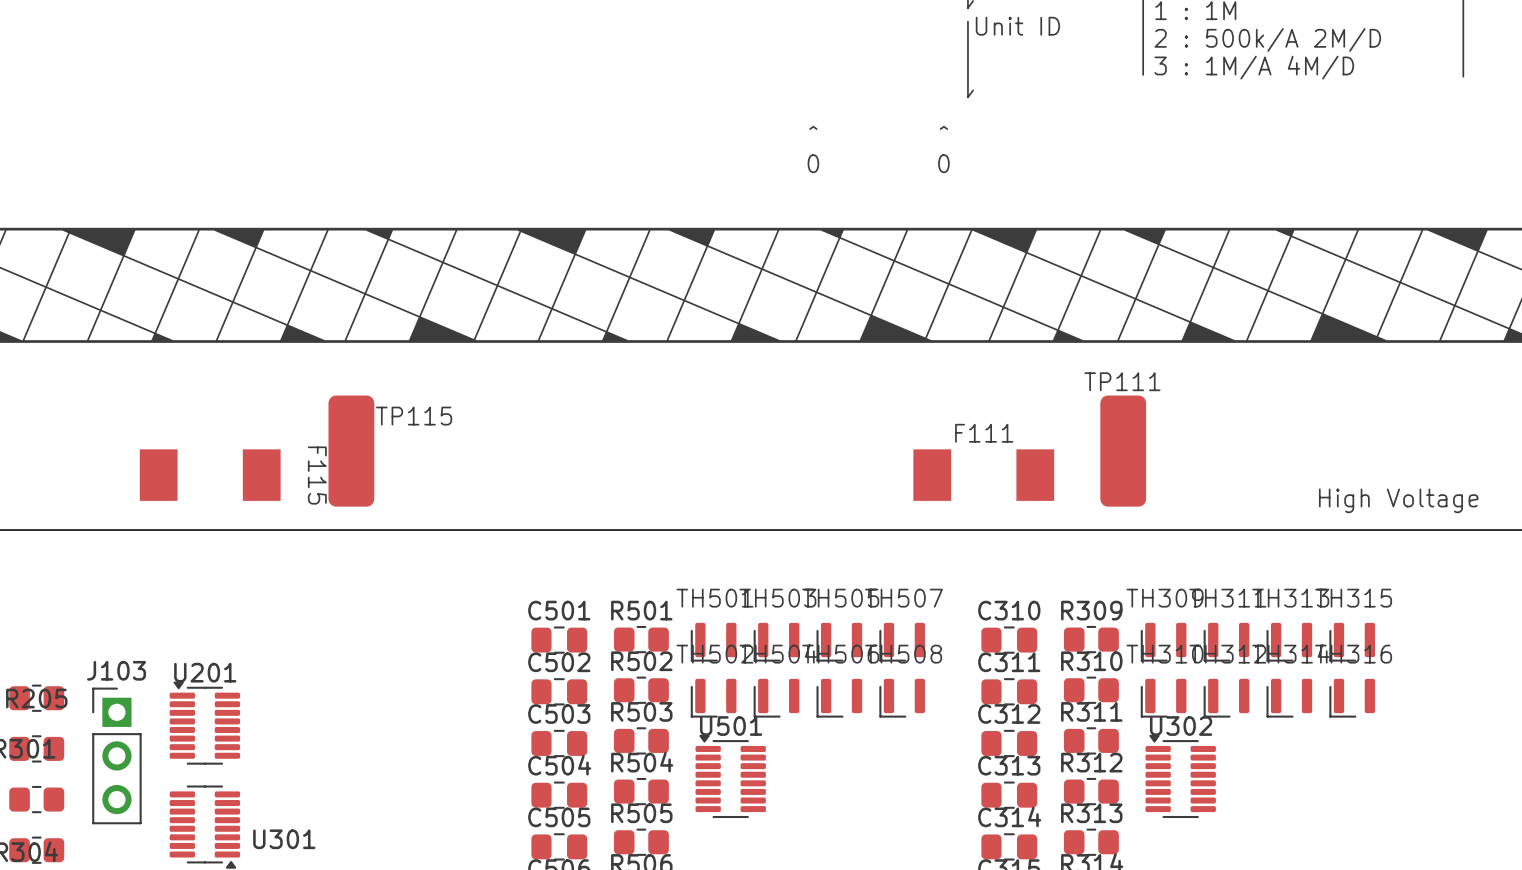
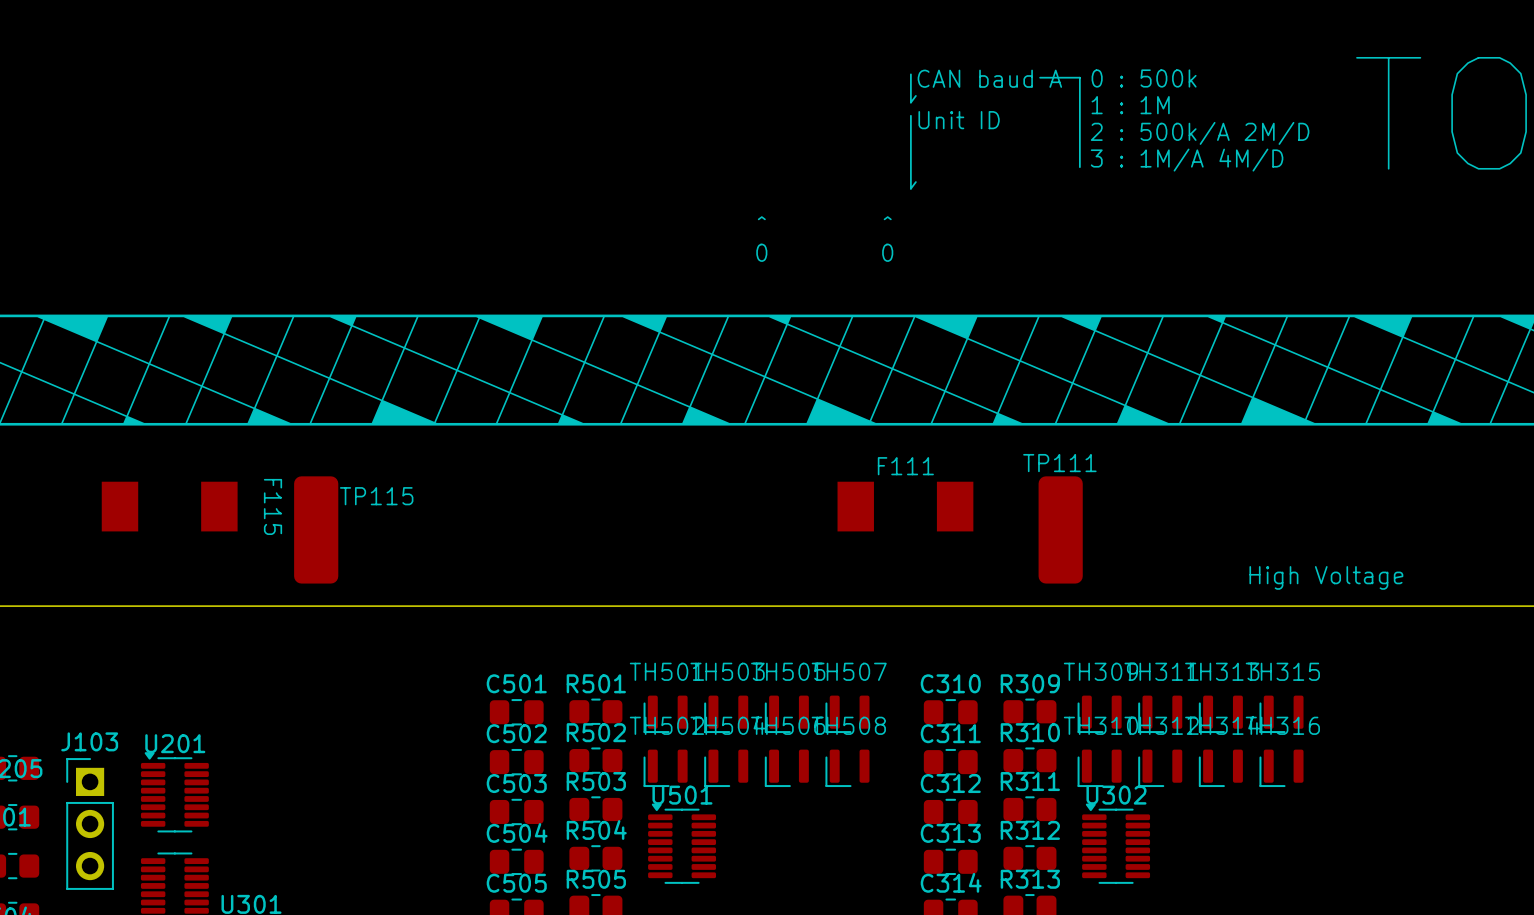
F115 position: (210, 475) -> (169, 506)
F111 position: (983, 475) -> (905, 506)

